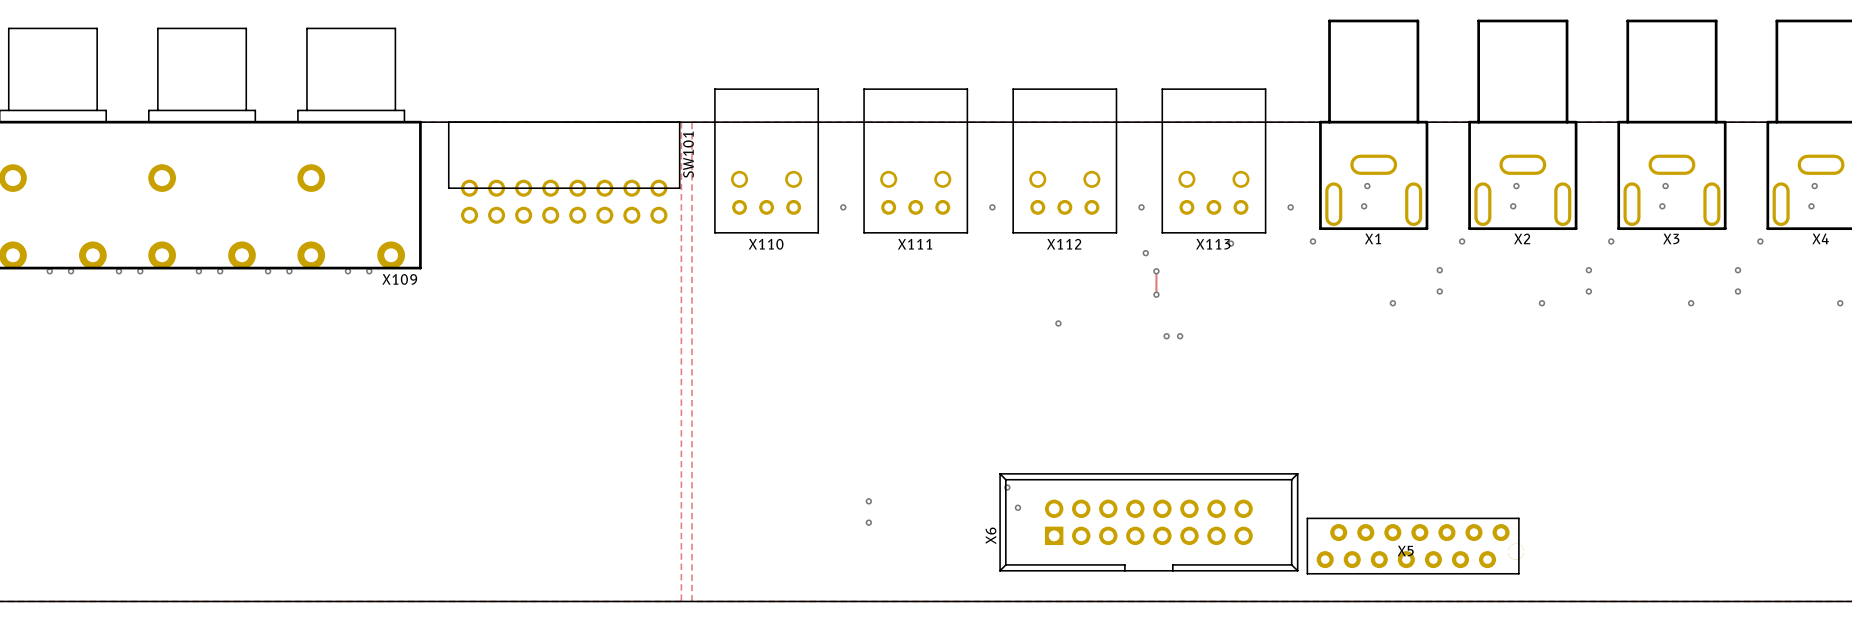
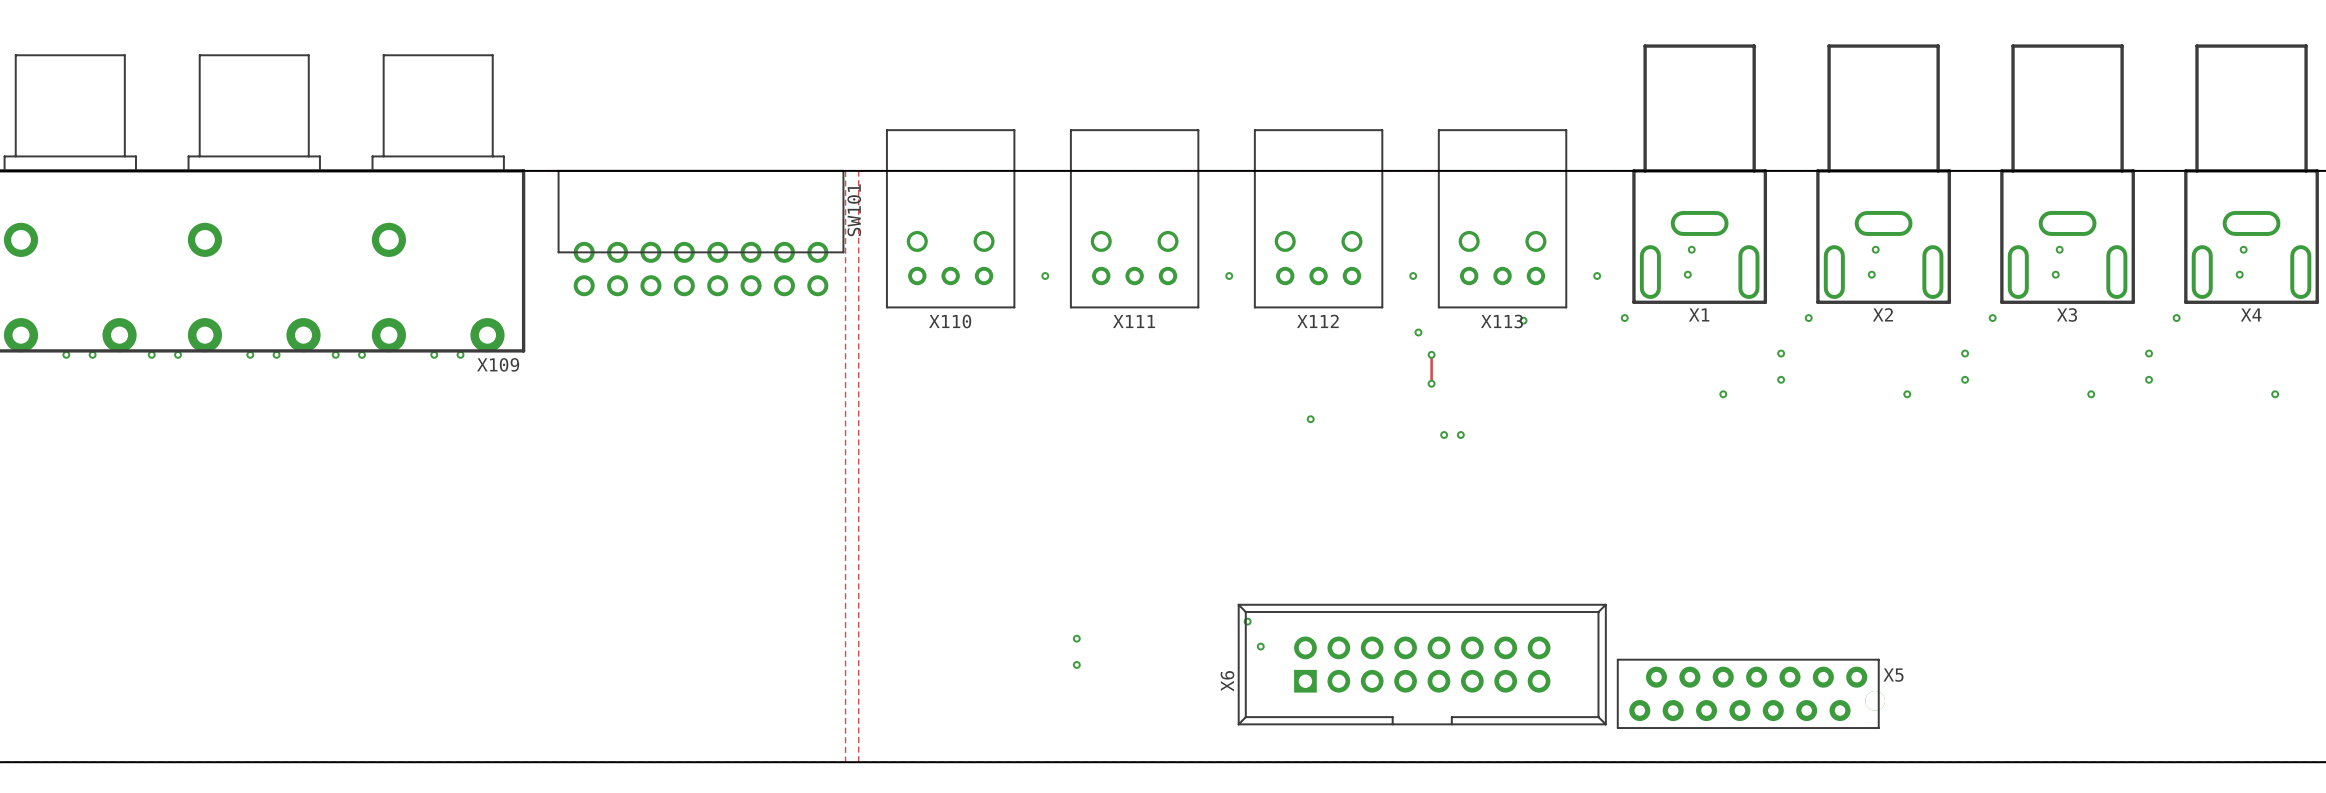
X5 name position: X5 (1405, 551) -> X5 (1893, 675)

